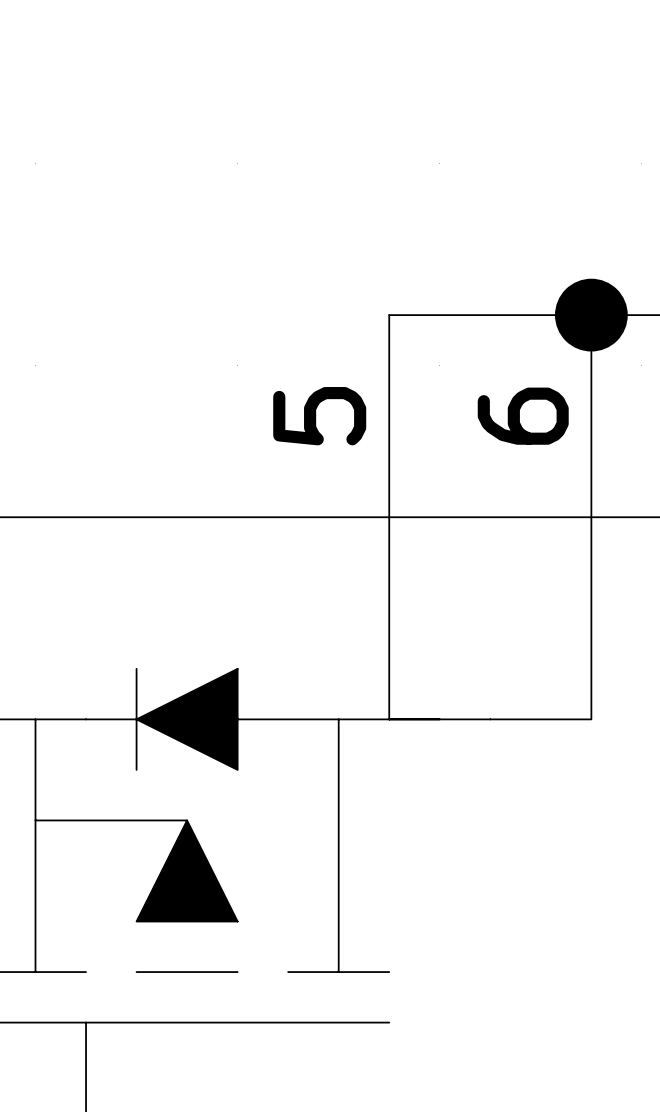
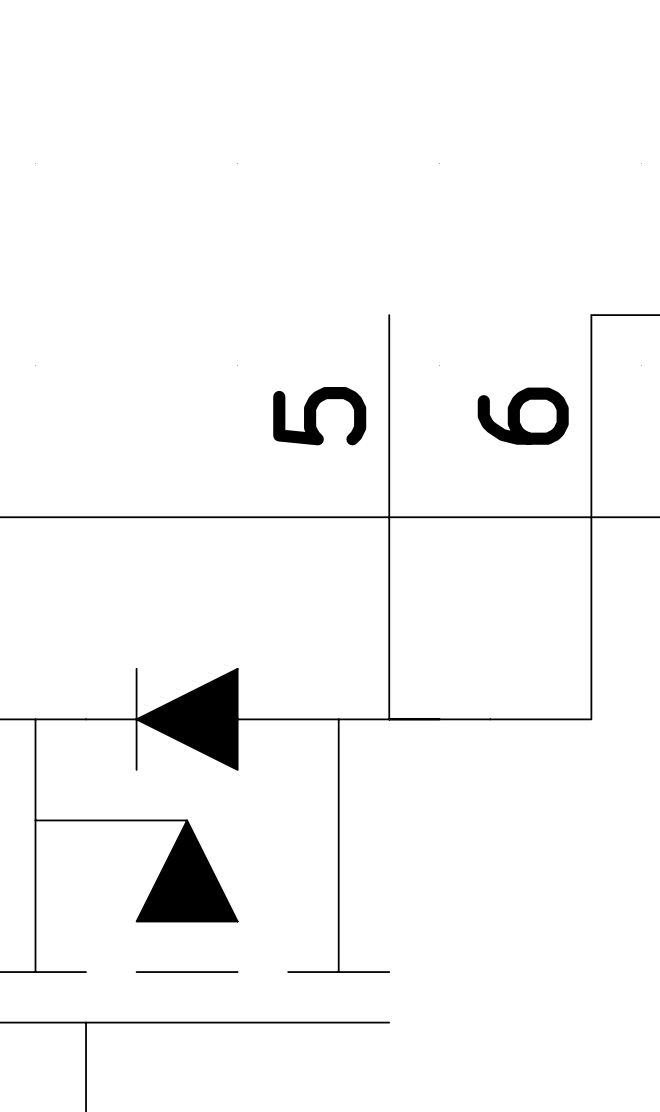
wire: (389, 315) (591, 315) -> none
junction: (591, 315) -> none

